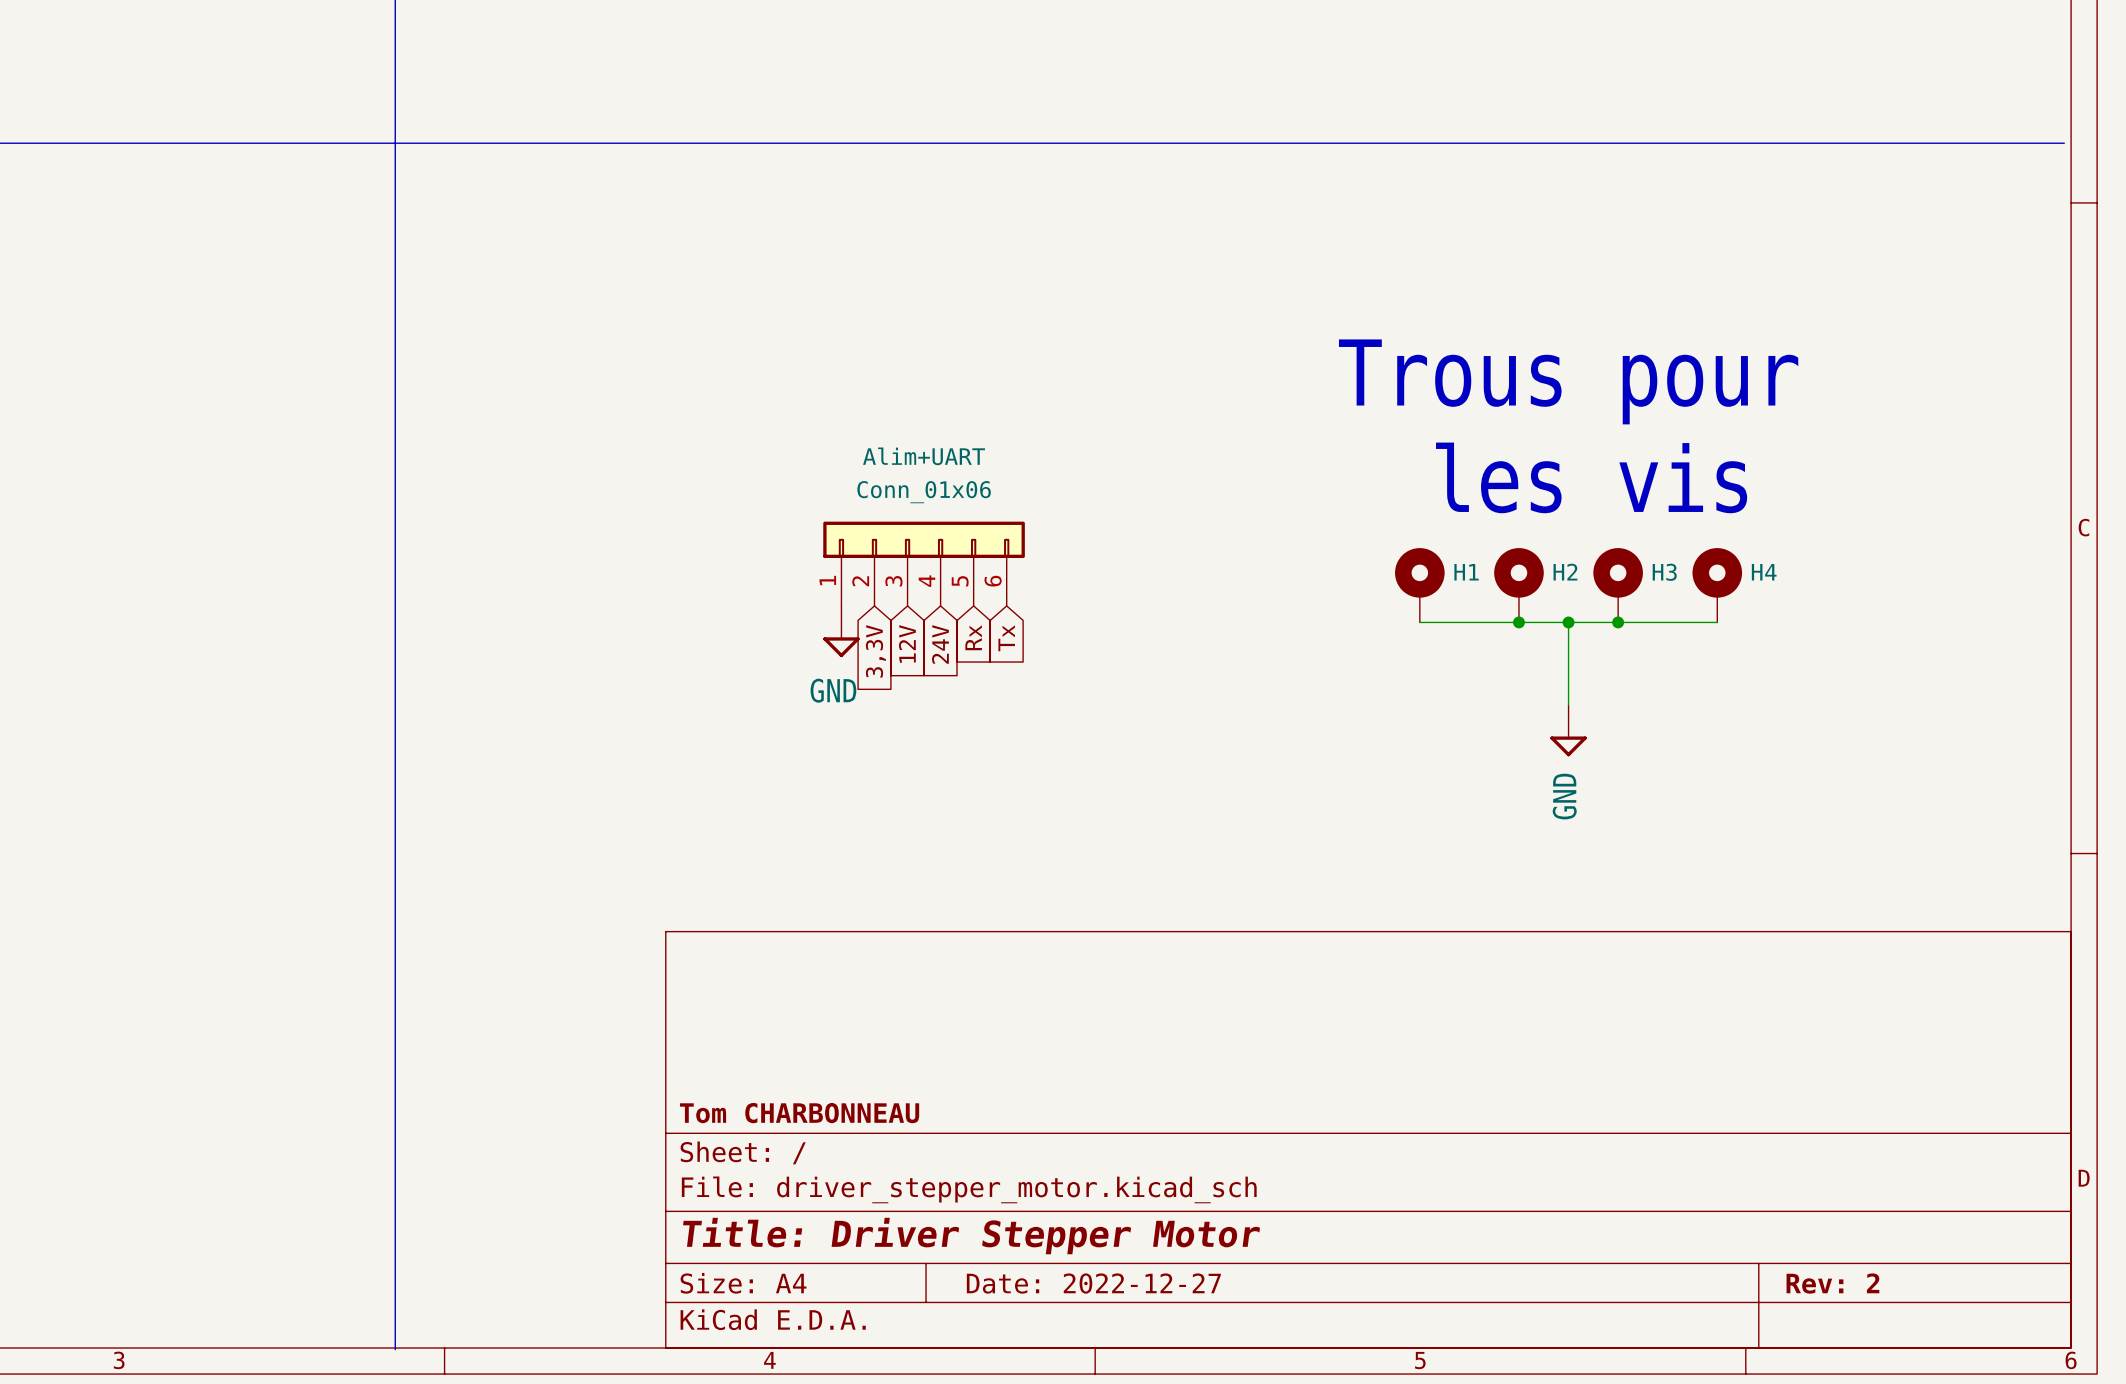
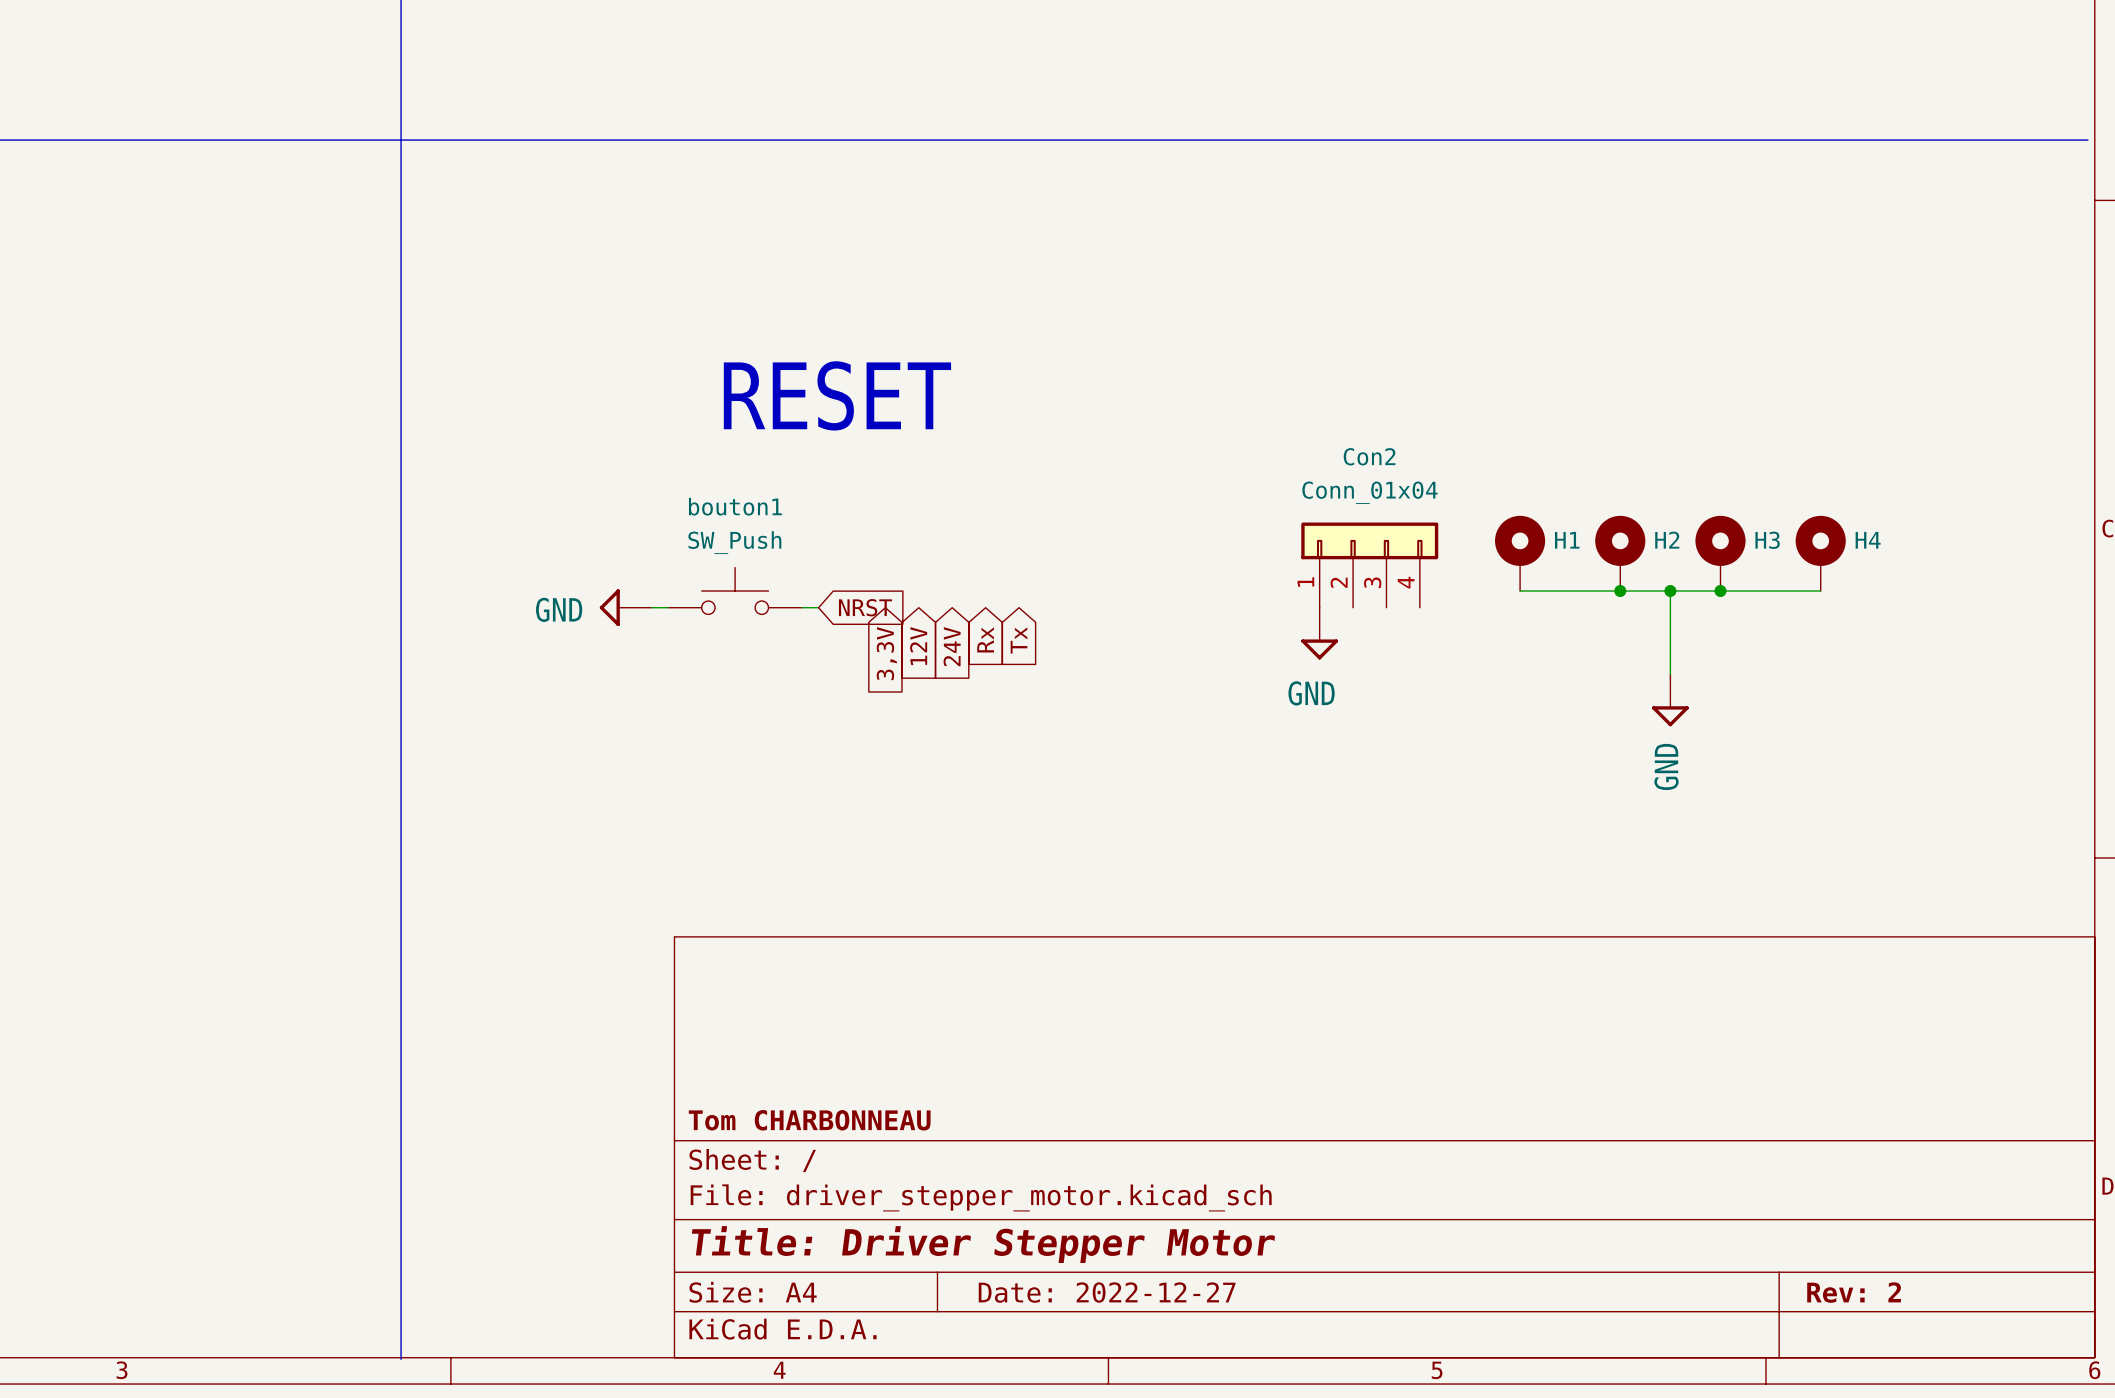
text: Trous pour (1568, 381) -> none
text: none -> RESET (837, 395)
text: les vis (1591, 477) -> none
Alim+UART: Conn_01x06 (924, 563) -> none
Con2: none -> Conn_01x04 (1369, 565)
H1 position: (1419, 585) -> (1520, 553)
H2 position: (1518, 585) -> (1620, 553)
H3 position: (1618, 585) -> (1720, 553)
H4 position: (1717, 585) -> (1820, 553)
bouton1: none -> SW_Push (735, 591)
junction: none -> (1620, 591)
junction: none -> (1670, 591)
junction: none -> (1720, 591)
wire: none -> (651, 607) (668, 607)
wire: none -> (801, 607) (818, 607)
global label: none -> NRST (865, 607)
wire: (1419, 622) (1717, 622) -> (1520, 591) (1820, 591)
junction: (1518, 622) -> none
wire: (1568, 622) (1568, 705) -> (1670, 591) (1670, 674)
junction: (1568, 622) -> none
junction: (1618, 622) -> none
power symbol position: GND (841, 631) -> GND (625, 607)
power symbol: none -> GND (1319, 633)
power symbol rotation: 0° (841, 647) -> 90° clockwise (609, 607)
power symbol position: GND (1568, 730) -> GND (1670, 700)

